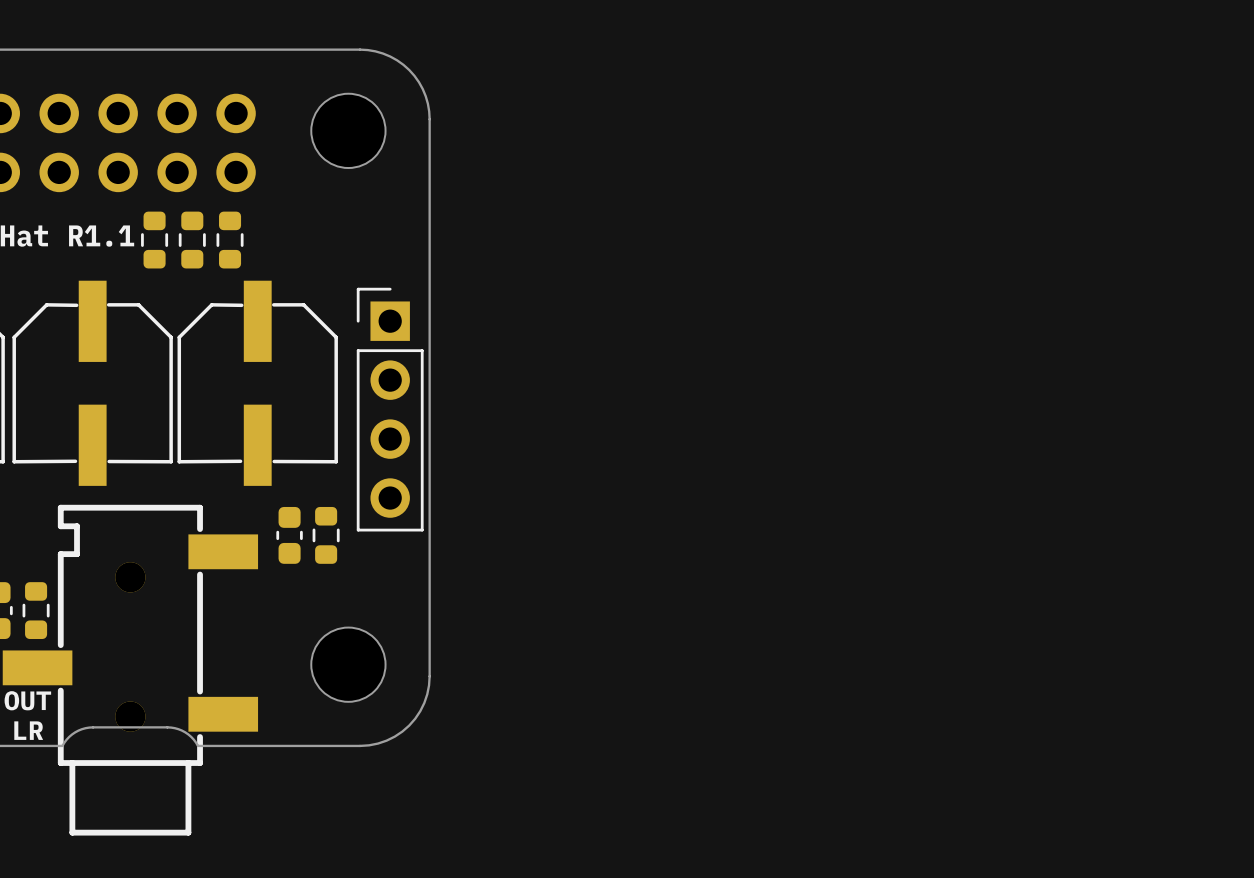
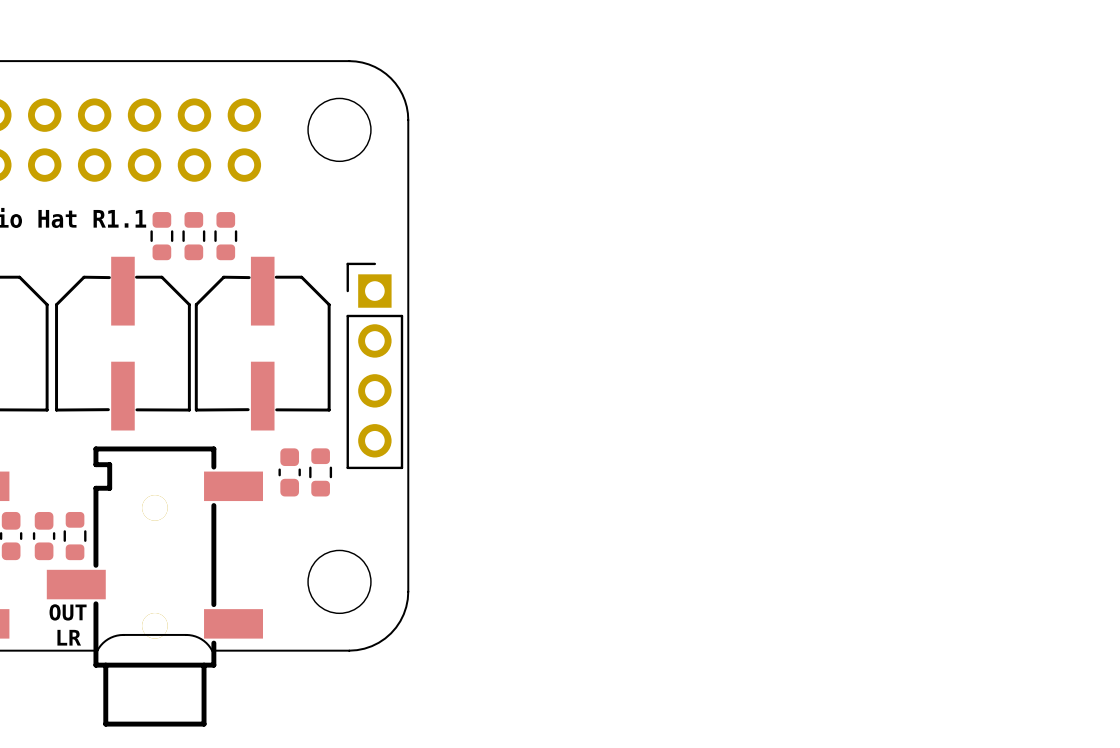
part: (154, 240) -> none
part: (192, 240) -> none
part: (230, 240) -> none
part: none -> (161, 236)
part: none -> (193, 236)
part: none -> (225, 236)

